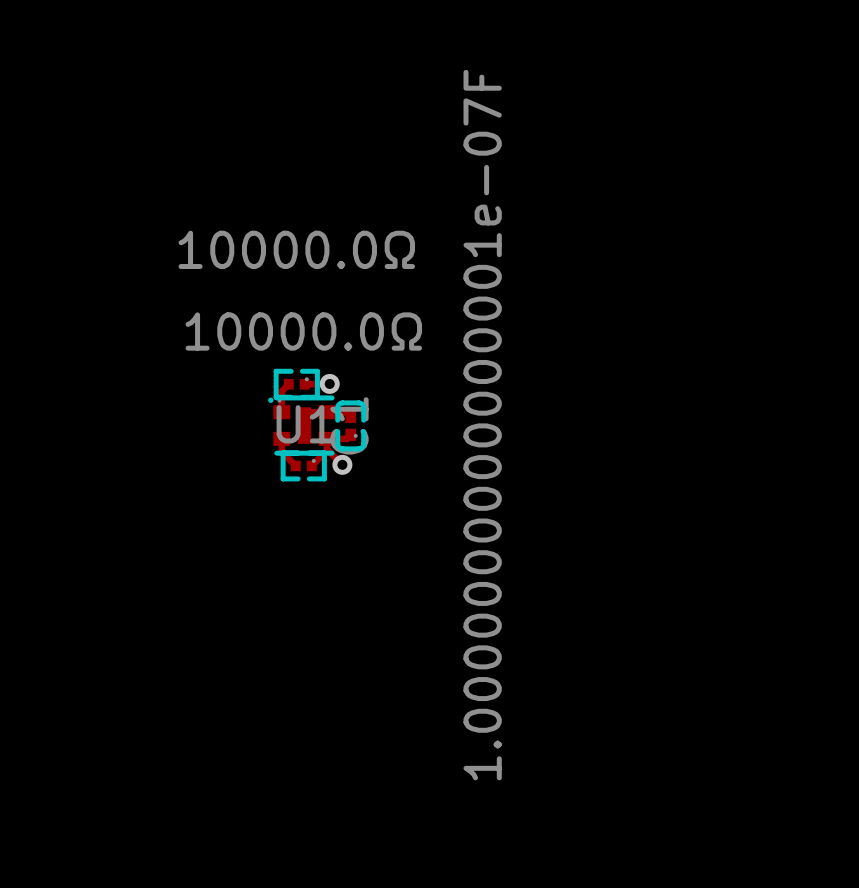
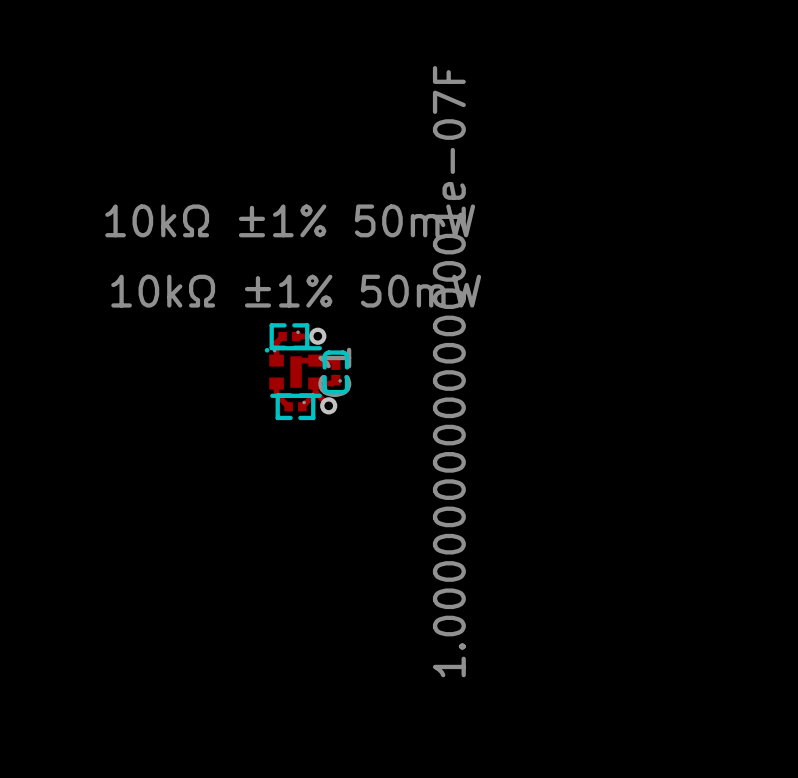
part value: 10000.0Ω (296, 249) -> 10kΩ ±1% 50mW (290, 220)
part value: 10000.0Ω (303, 331) -> 10kΩ ±1% 50mW (296, 291)
U1 name: U1 (305, 424) -> none

